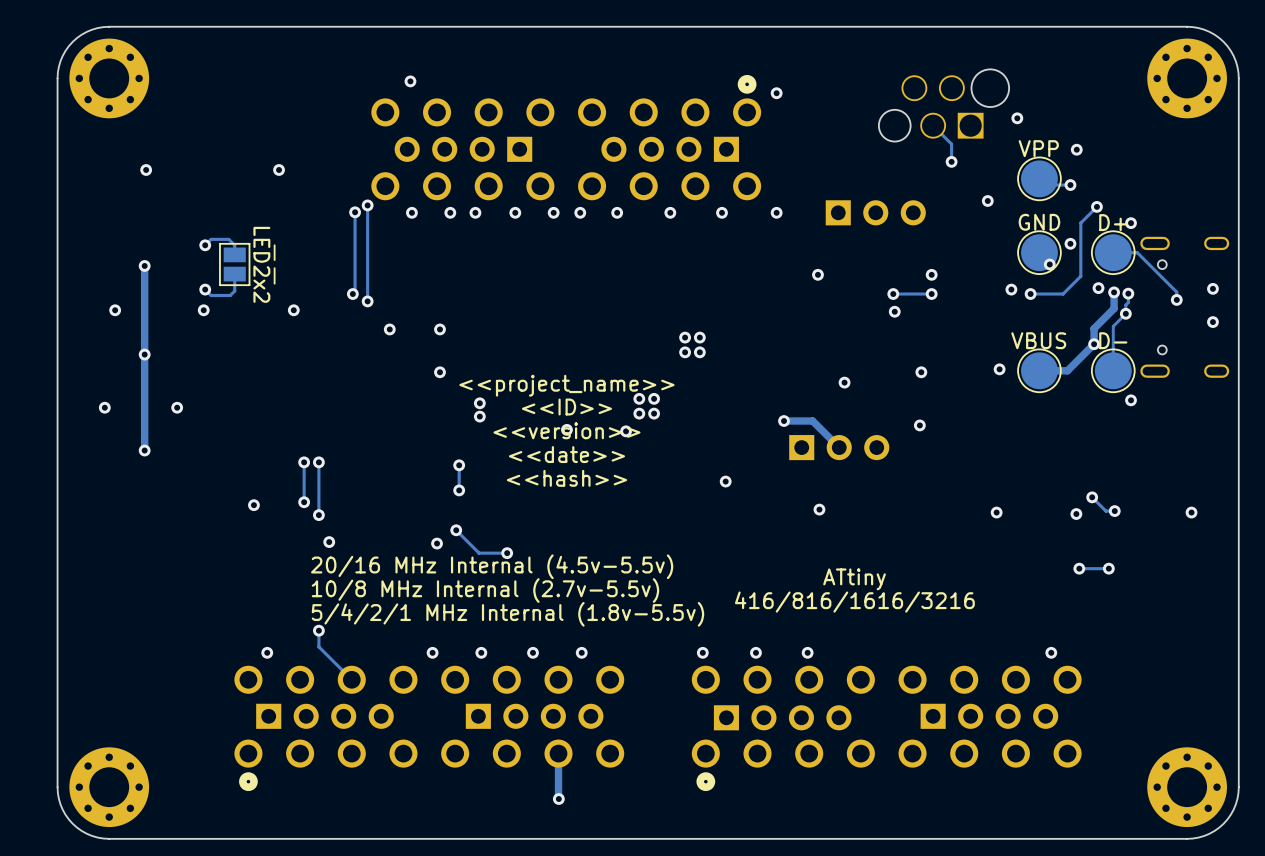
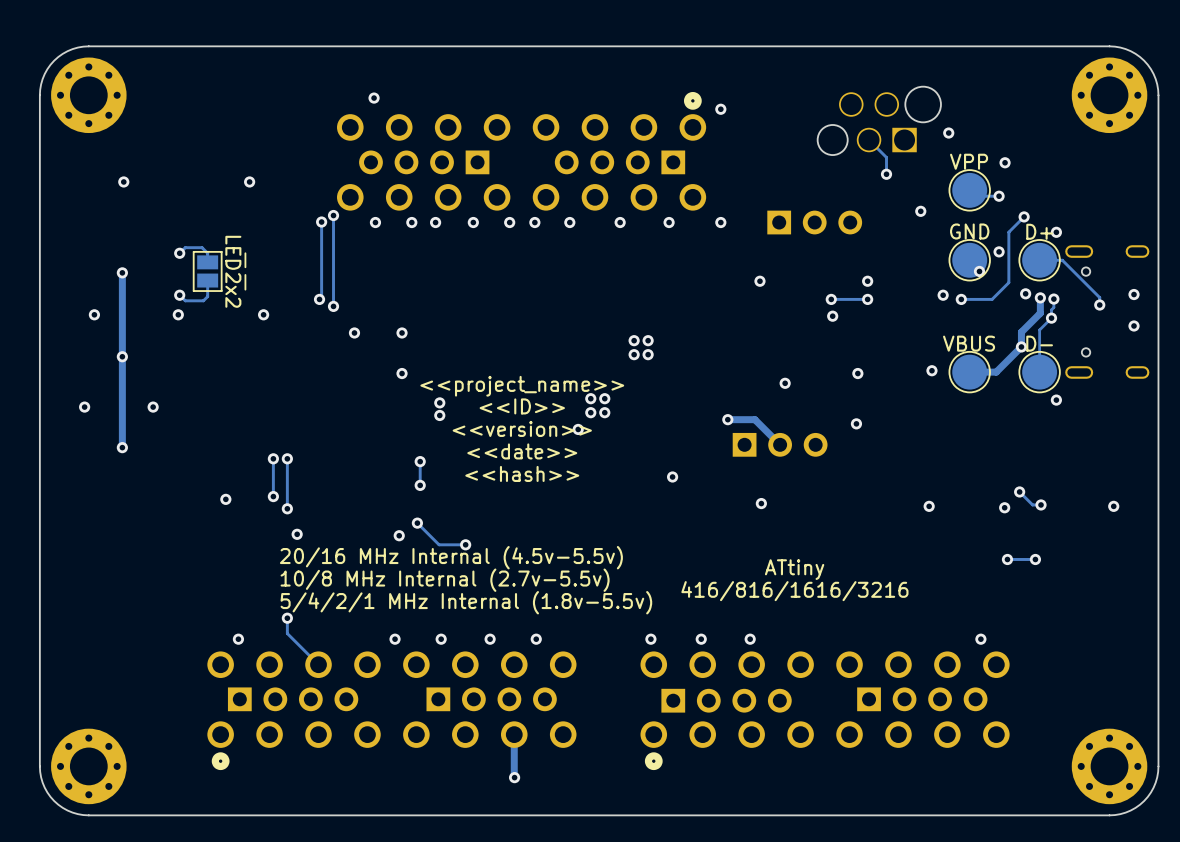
via: (566, 429) -> none

